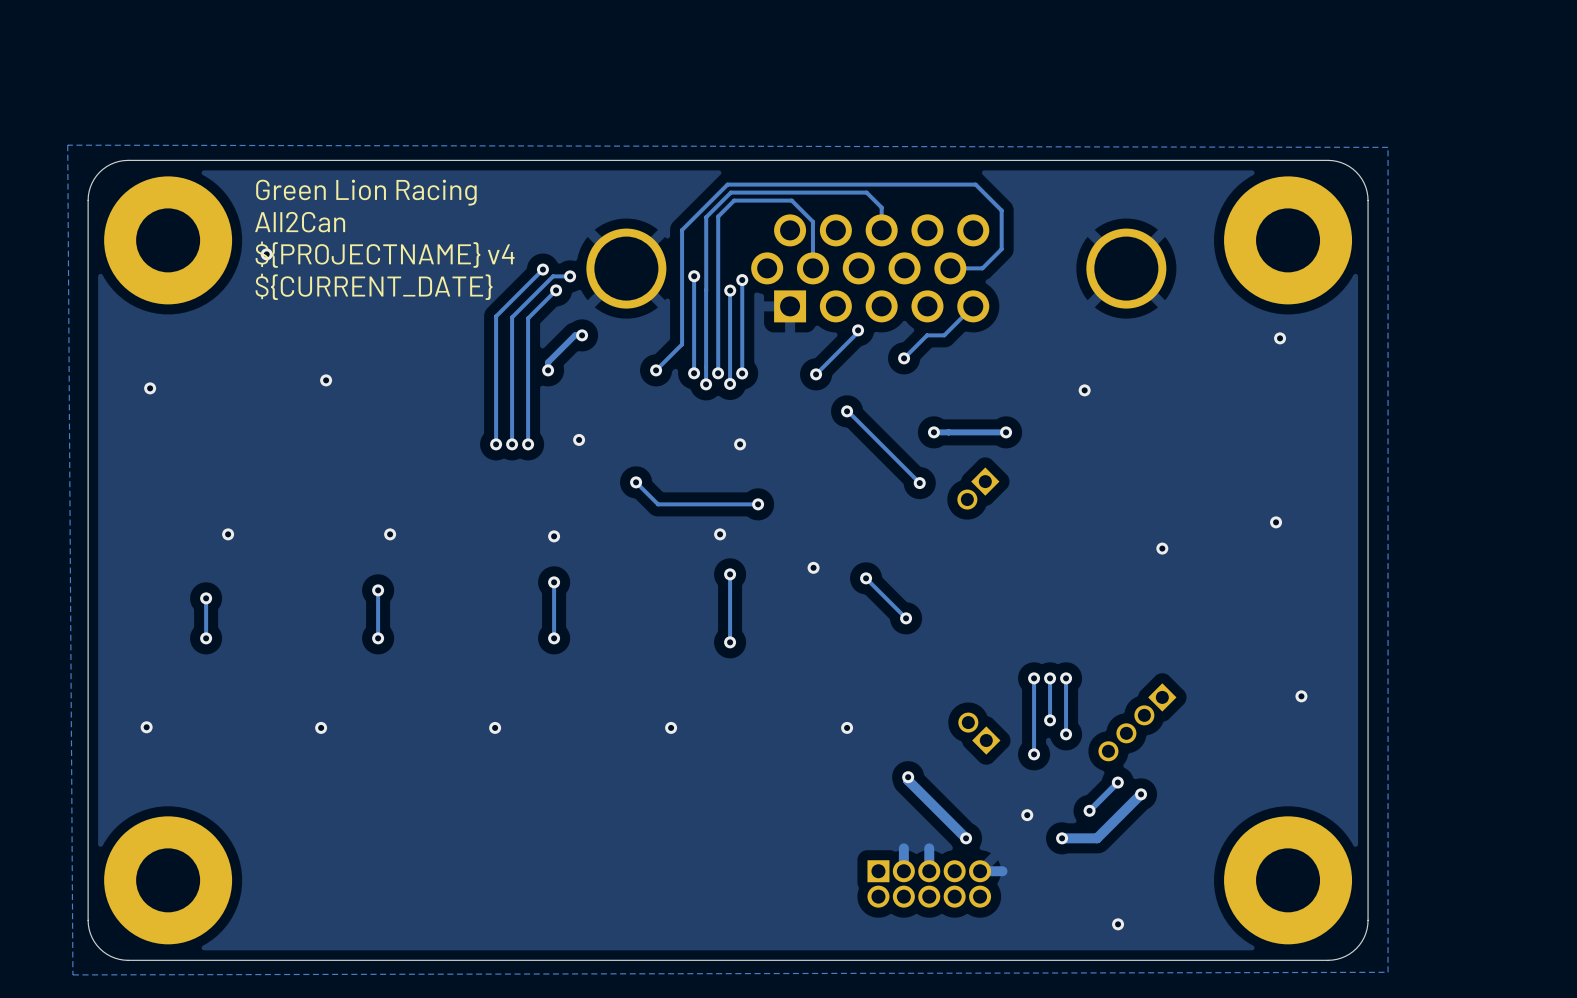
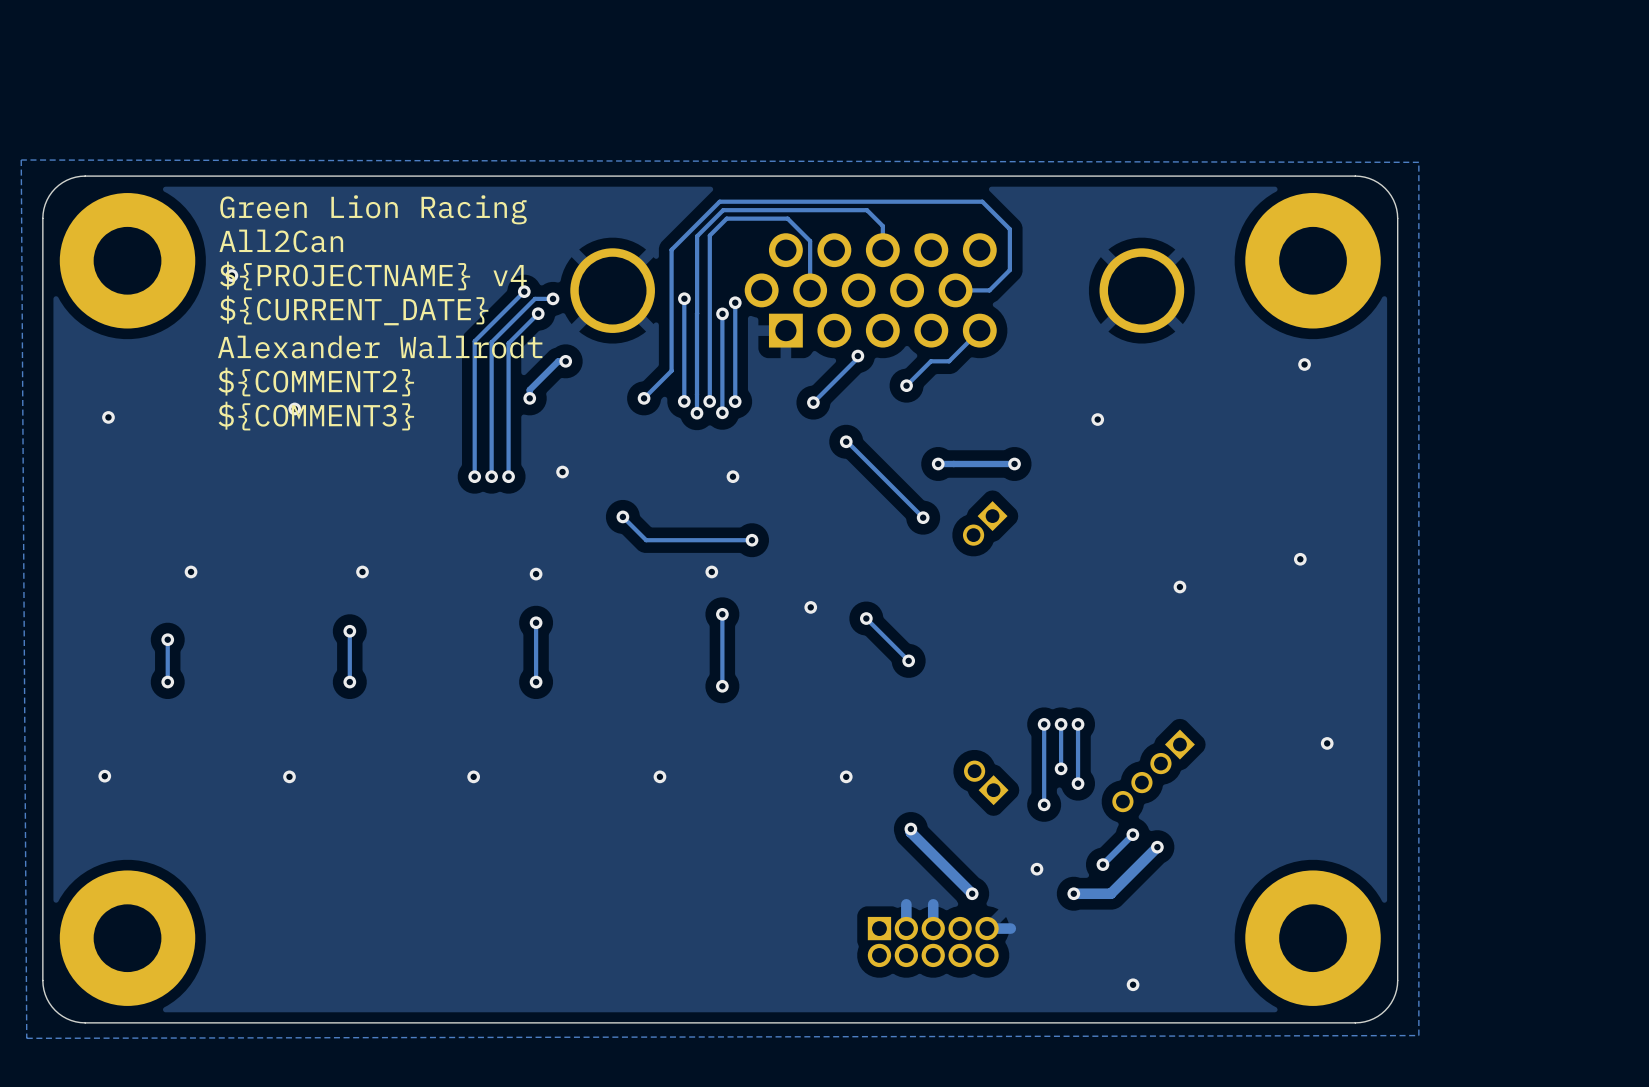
text: none -> Alexander Wallrodt (380, 347)
text: none -> ${COMMENT2} (316, 381)
text: none -> ${COMMENT3} (316, 416)

